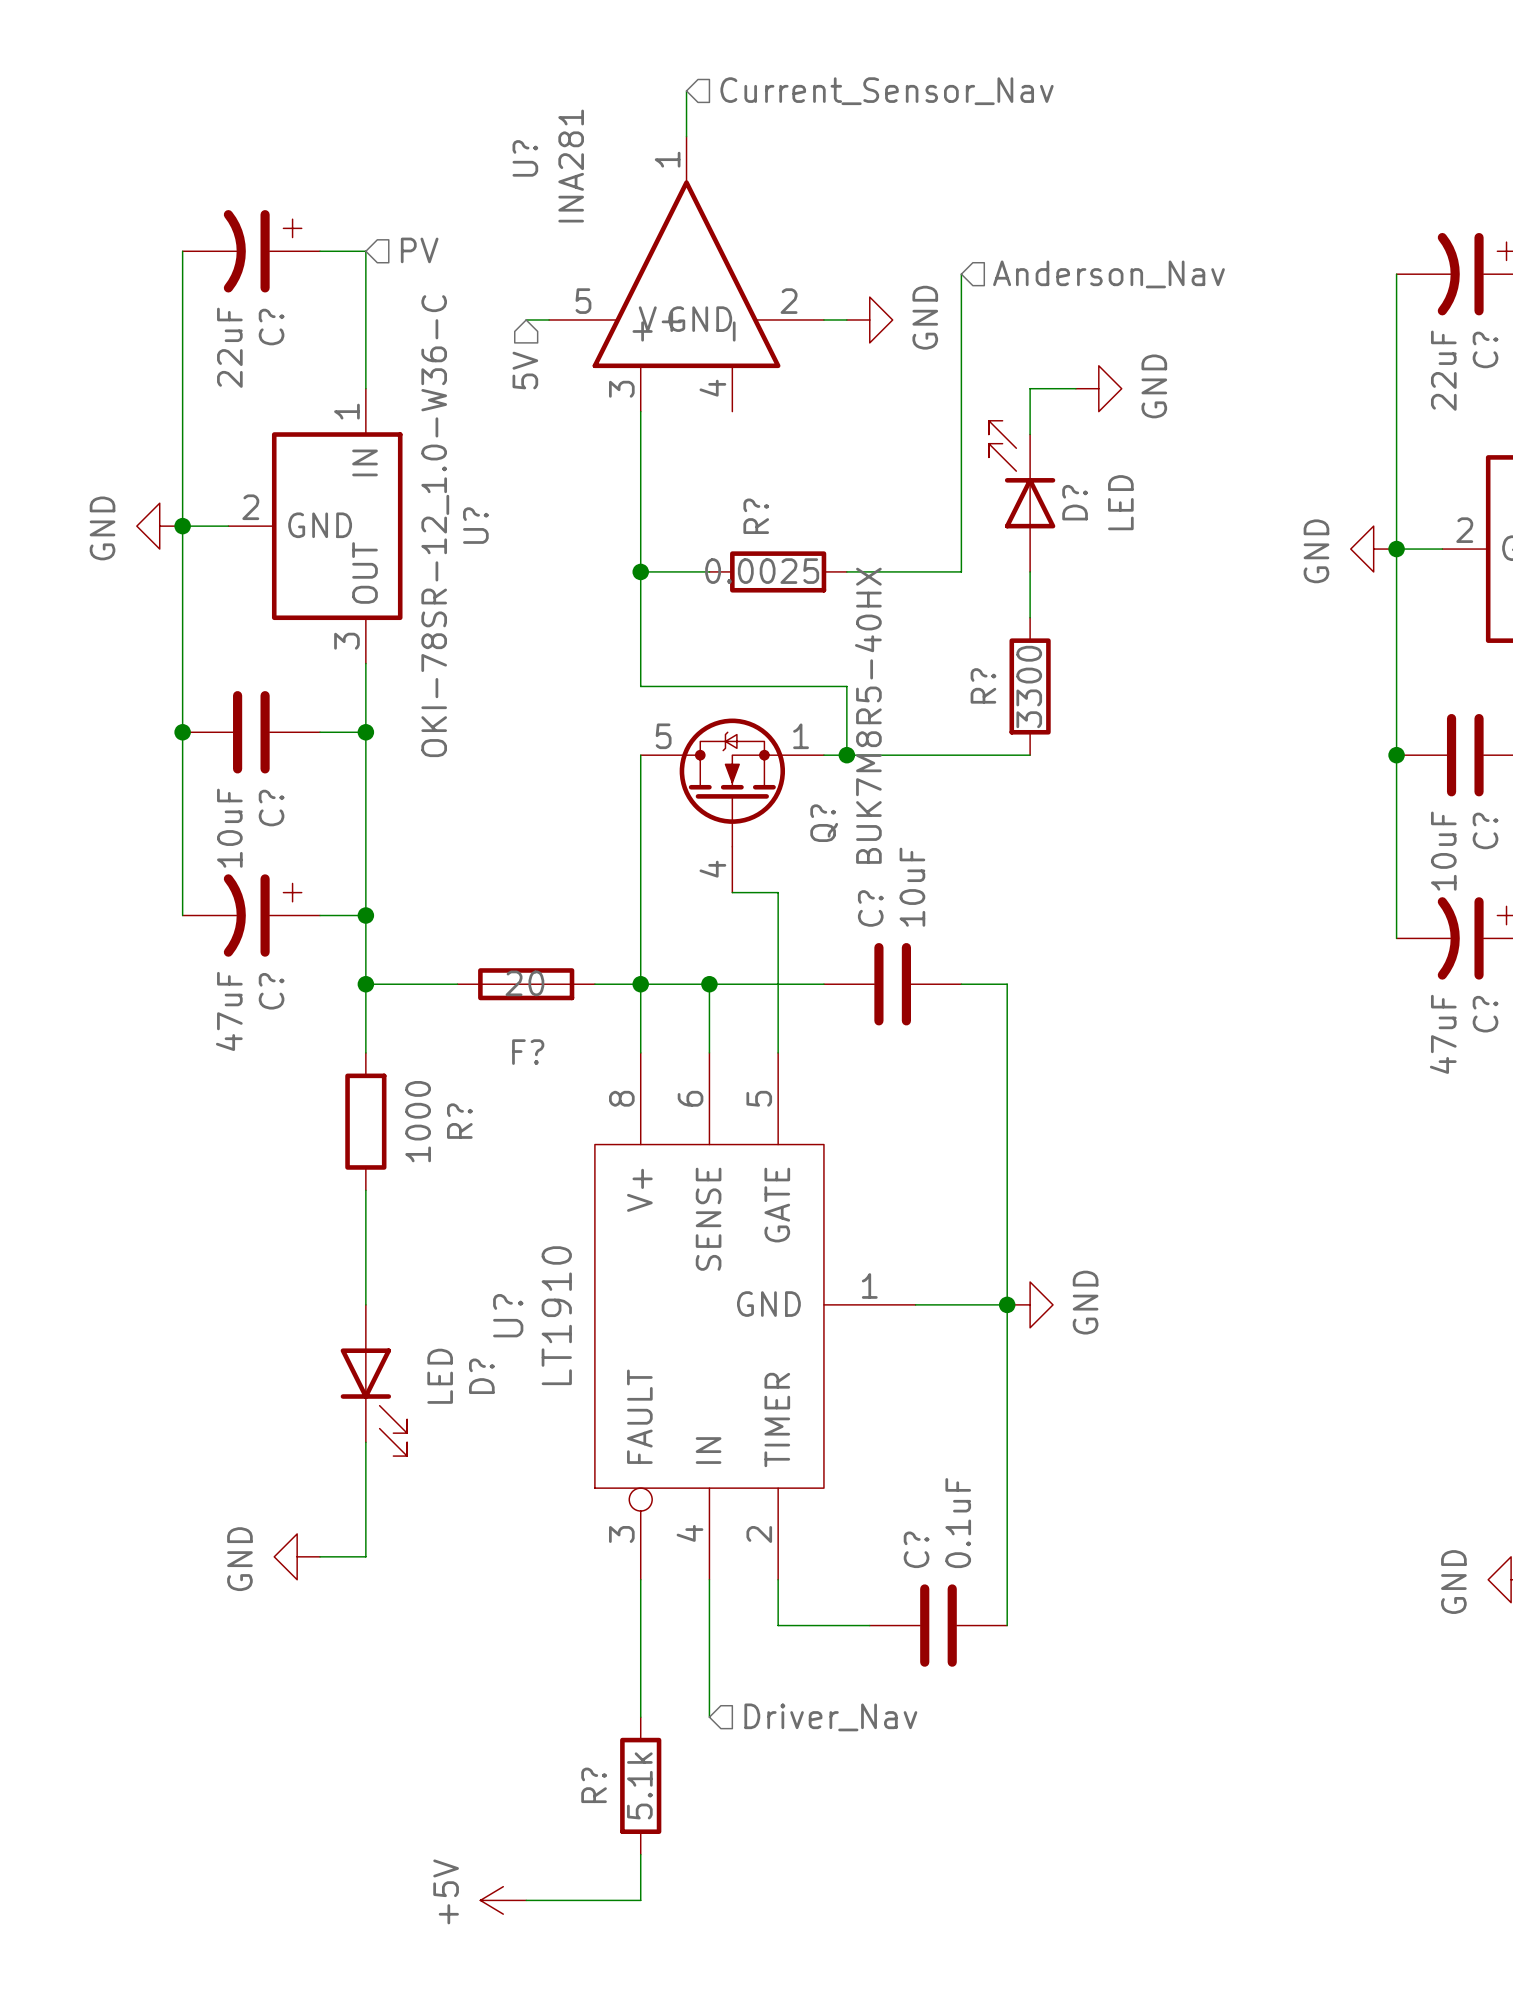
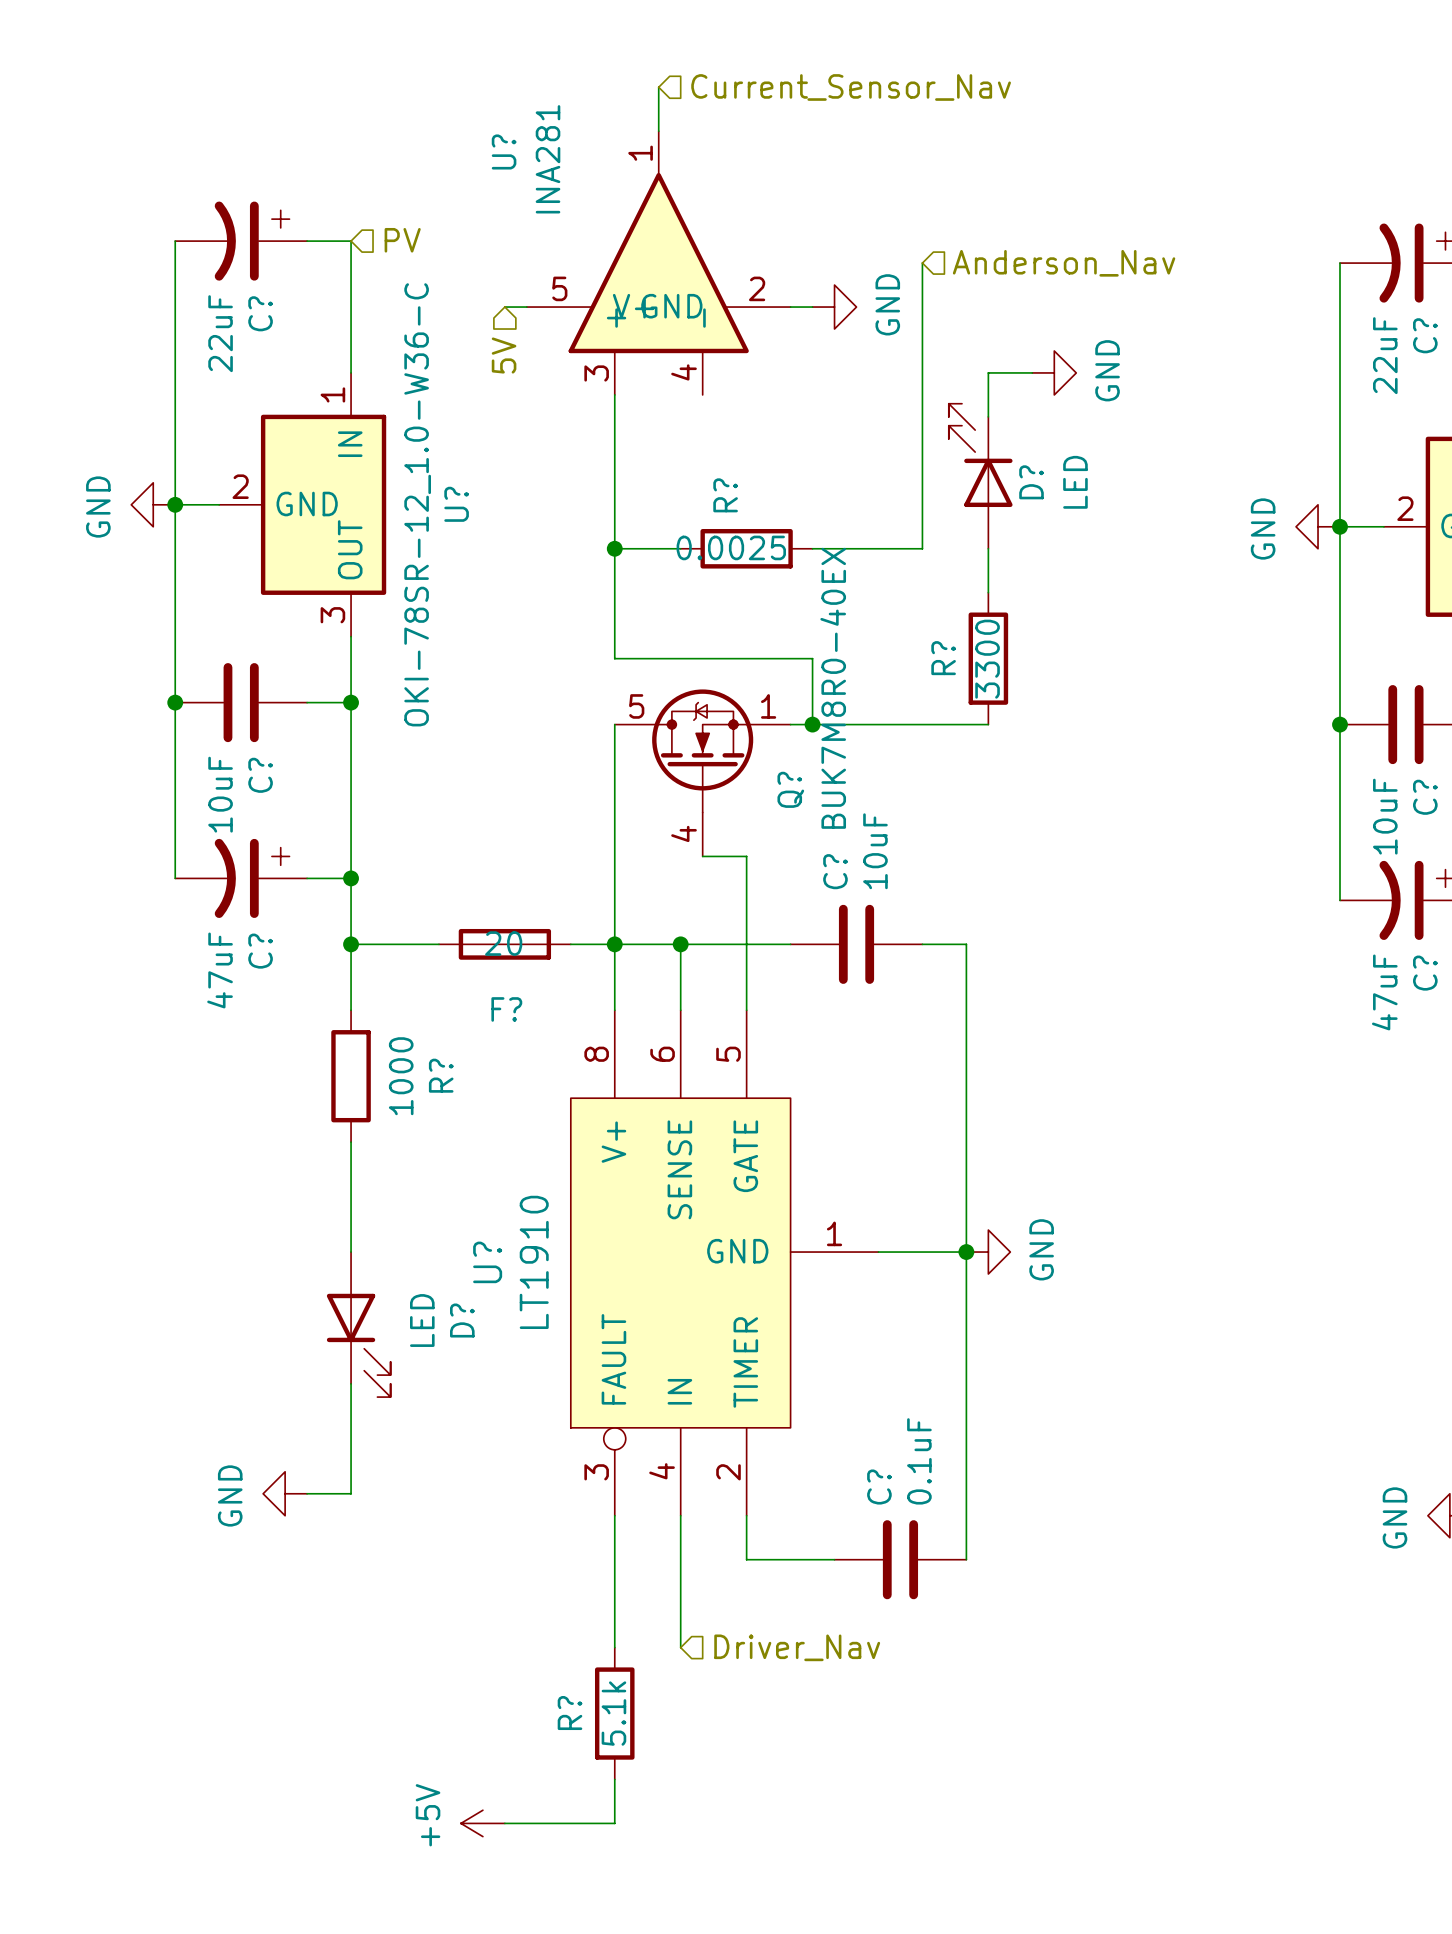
Q? value: BUK7M8R5-40HX (868, 715) -> BUK7M8R0-40EX (833, 688)

